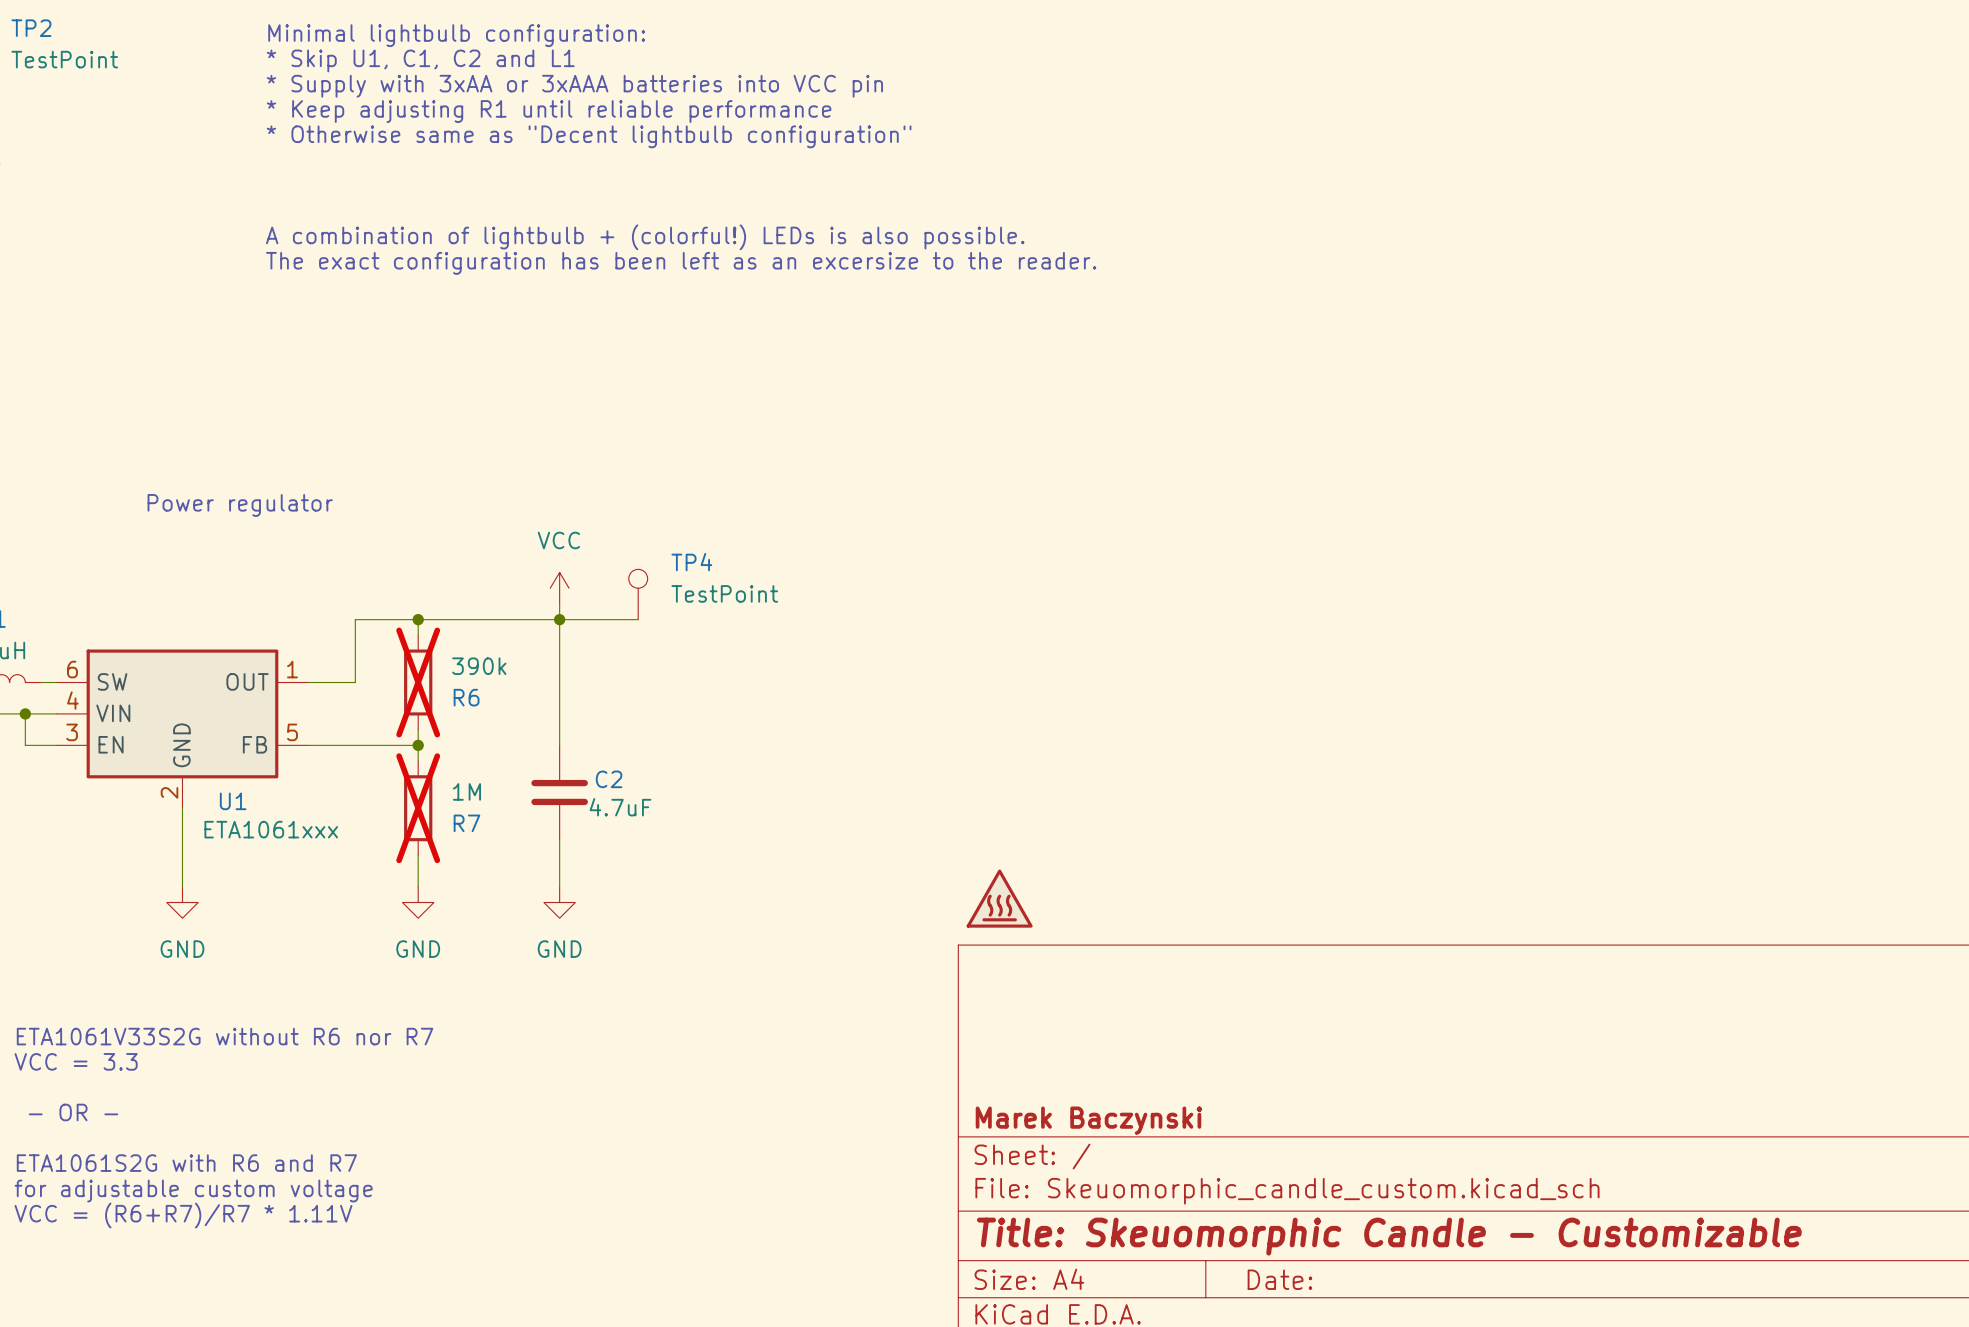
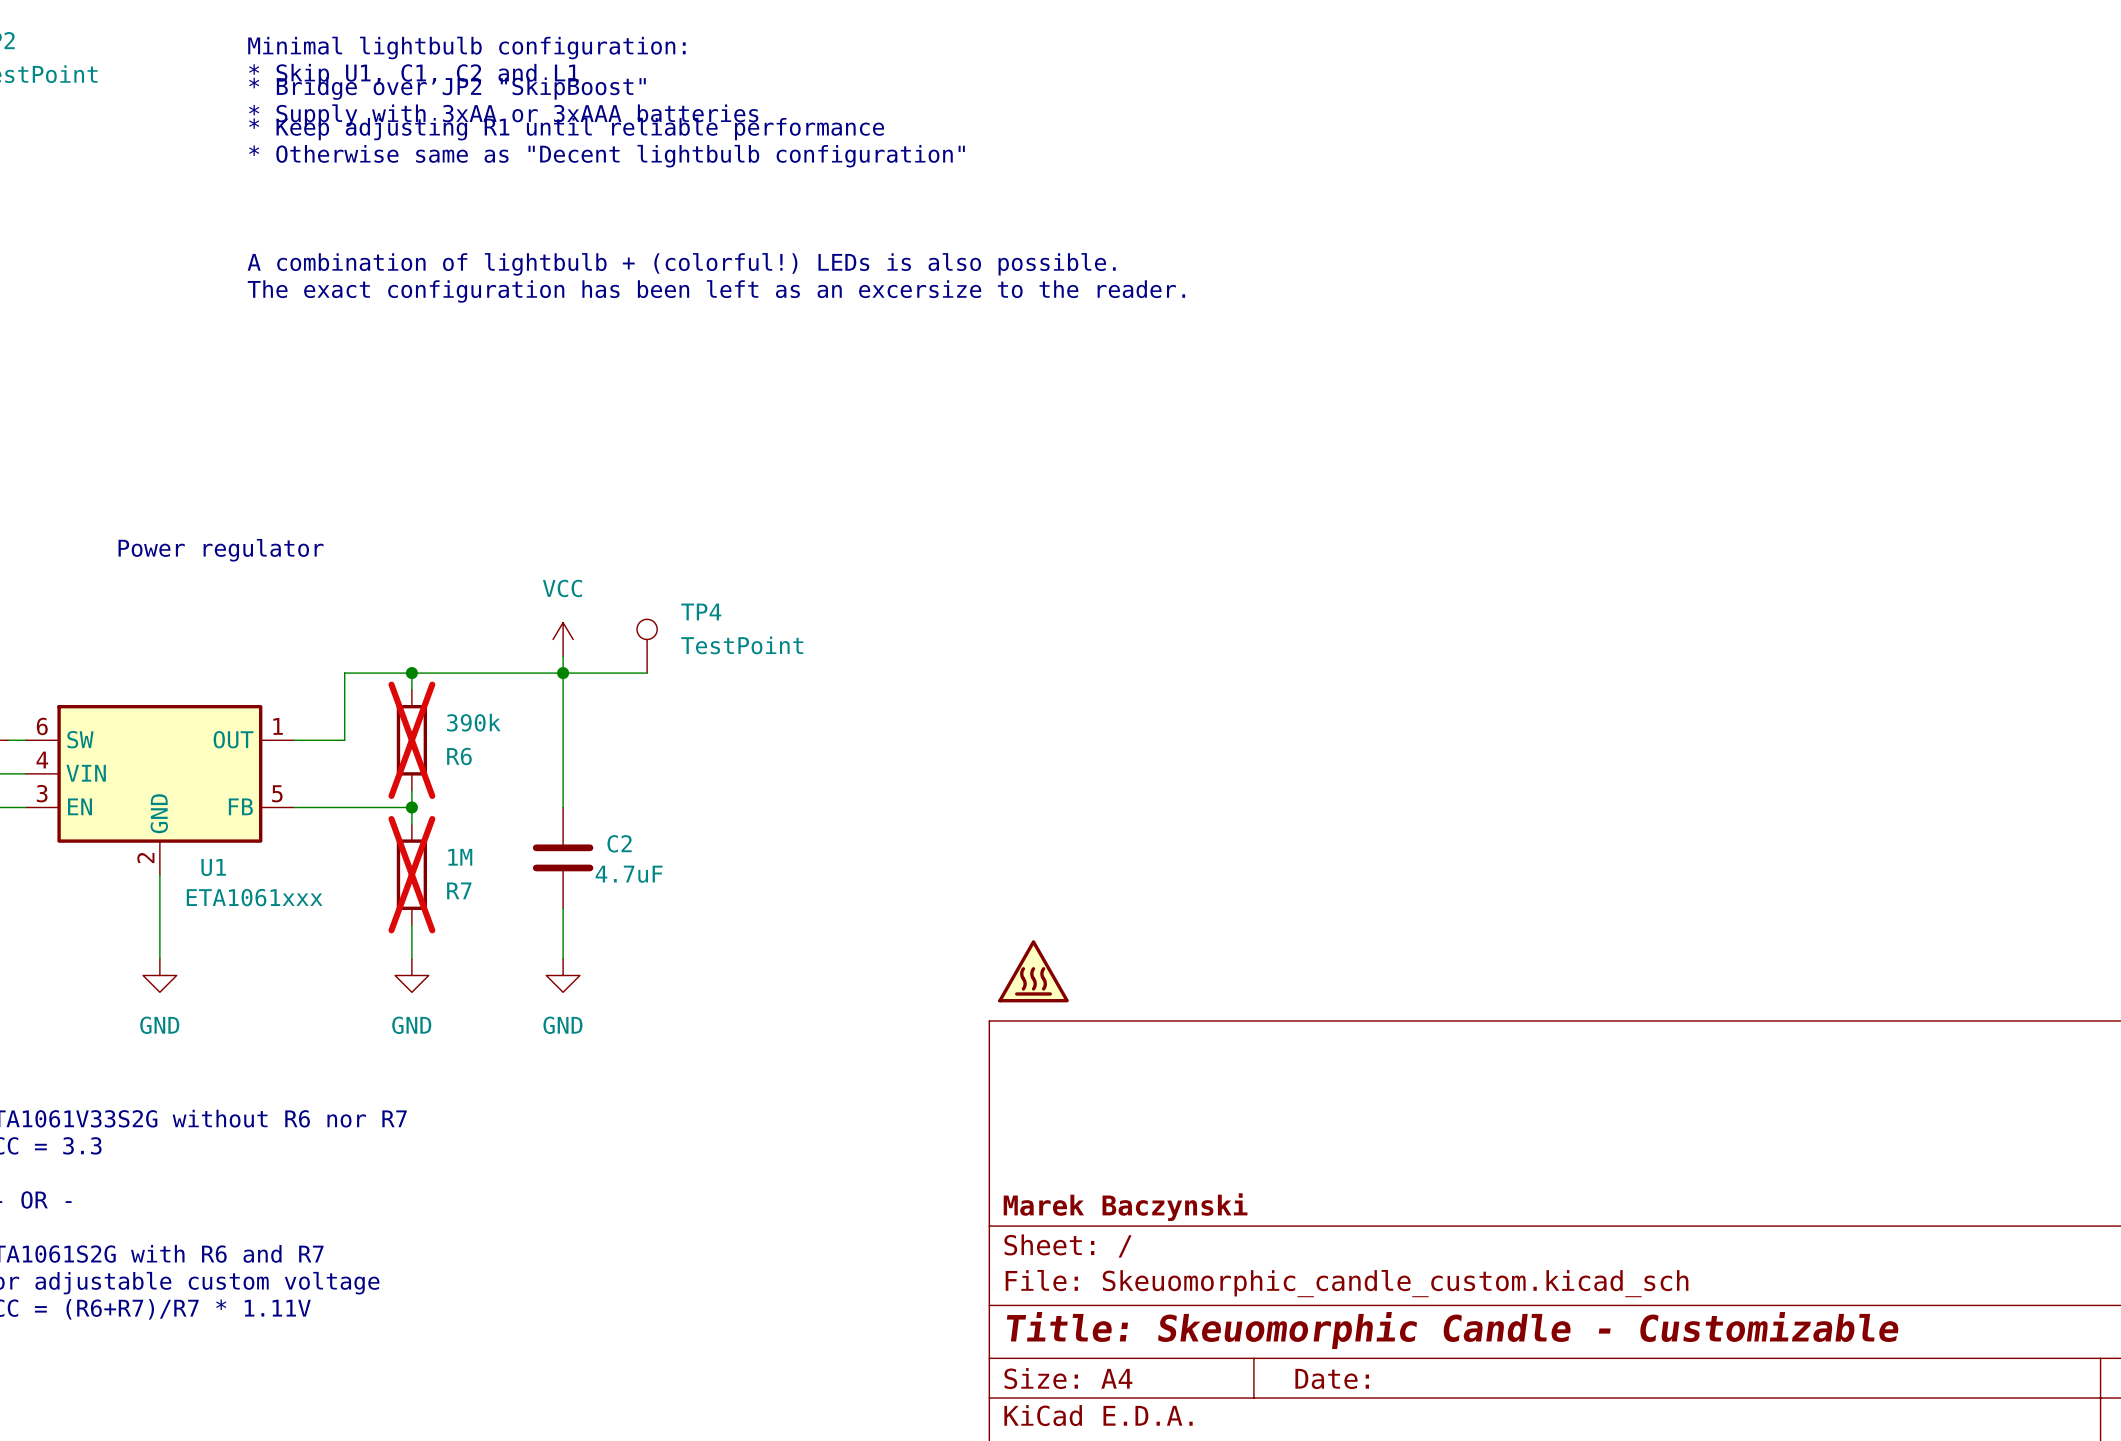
text: none -> * Bridge over JP2 "SkipBoost" (447, 88)
text: * Supply with 3xAA or 3xAAA batteries into VCC pin (574, 86) -> * Supply with 3xAA or 3xAAA batteries (503, 115)

